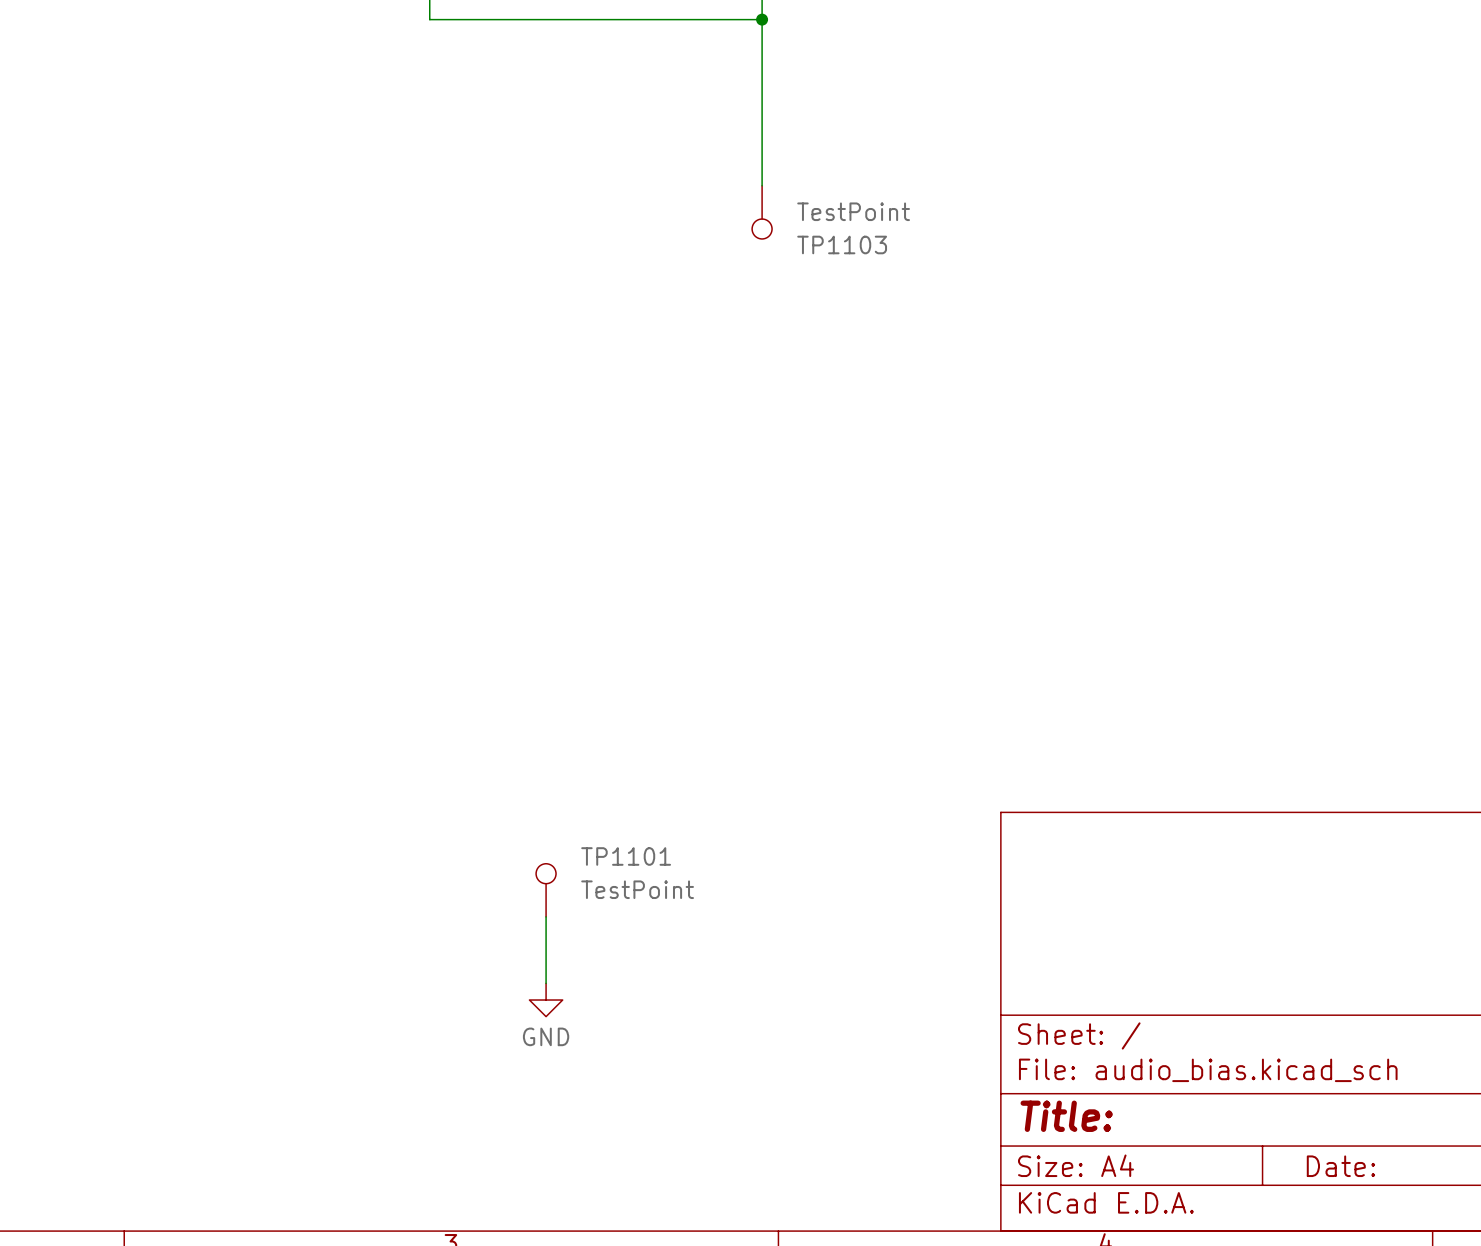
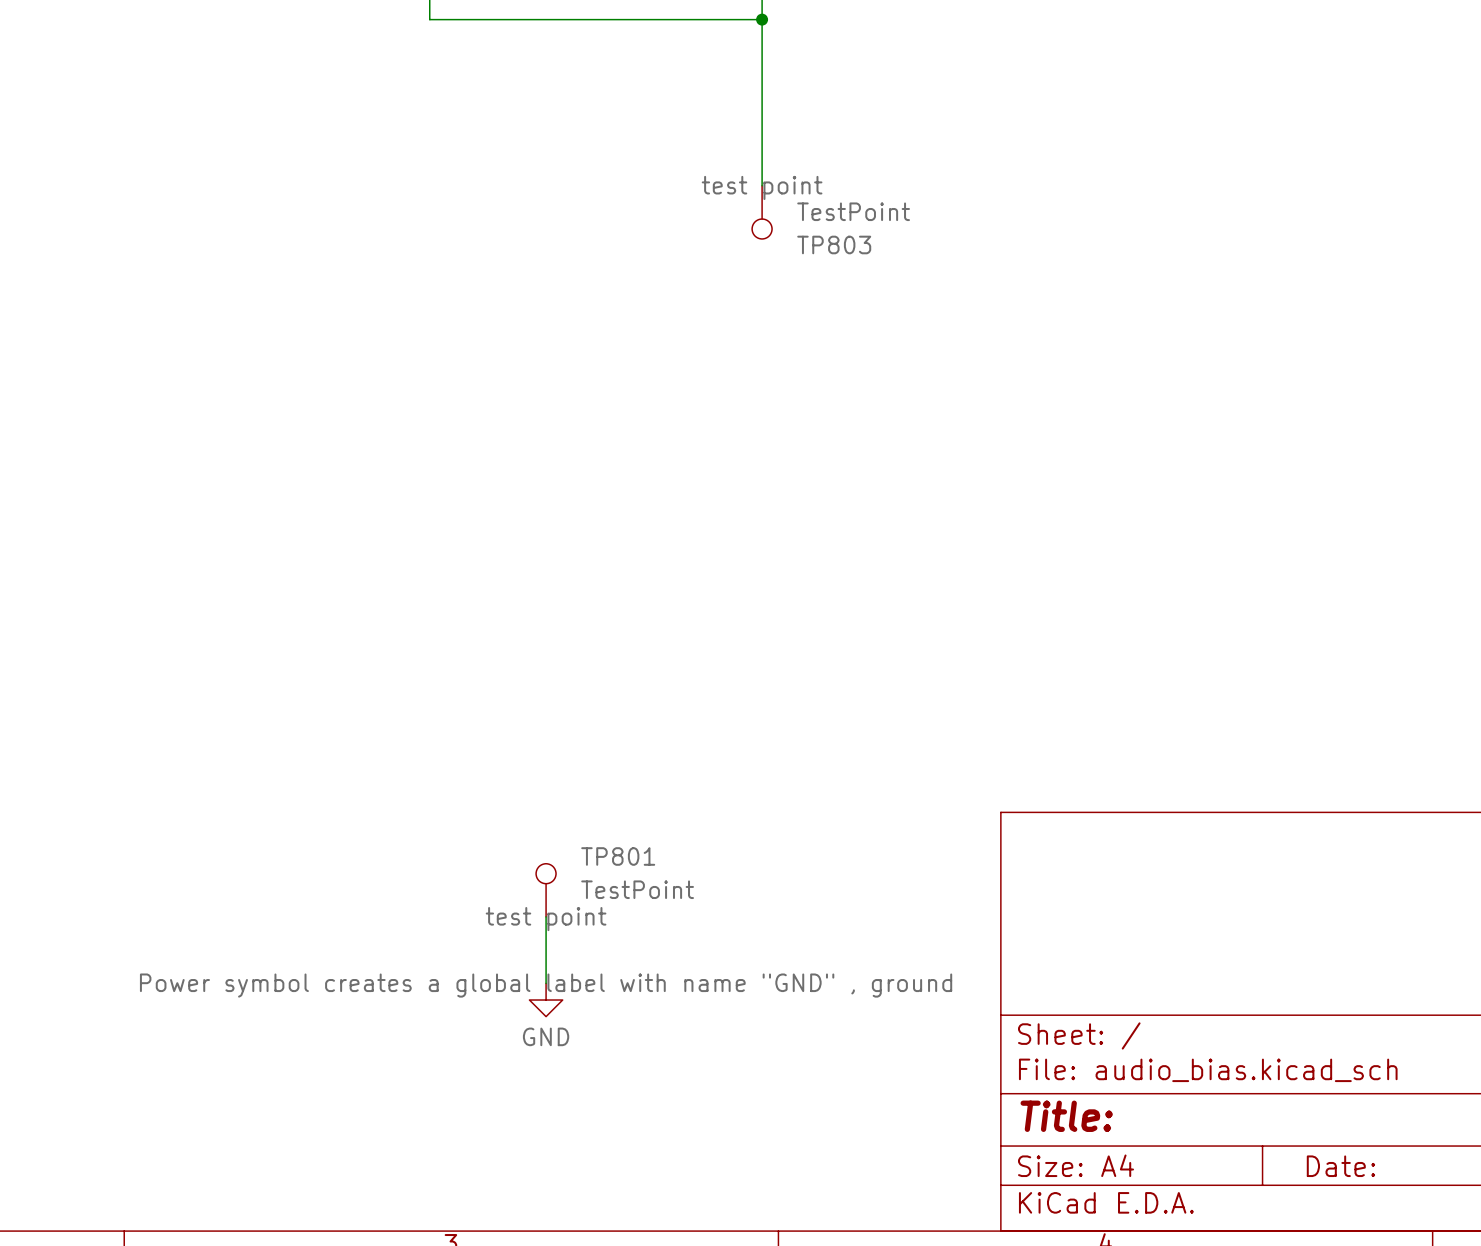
TP1103 text: none -> test point (762, 187)
TP1103 name: TP1103 (842, 244) -> TP803 (834, 244)
TP1101 name: TP1101 (626, 856) -> TP801 (618, 856)
TP1101 text: none -> test point (546, 919)
power symbol text: none -> Power symbol creates a global label with name "GND" , ground (546, 985)

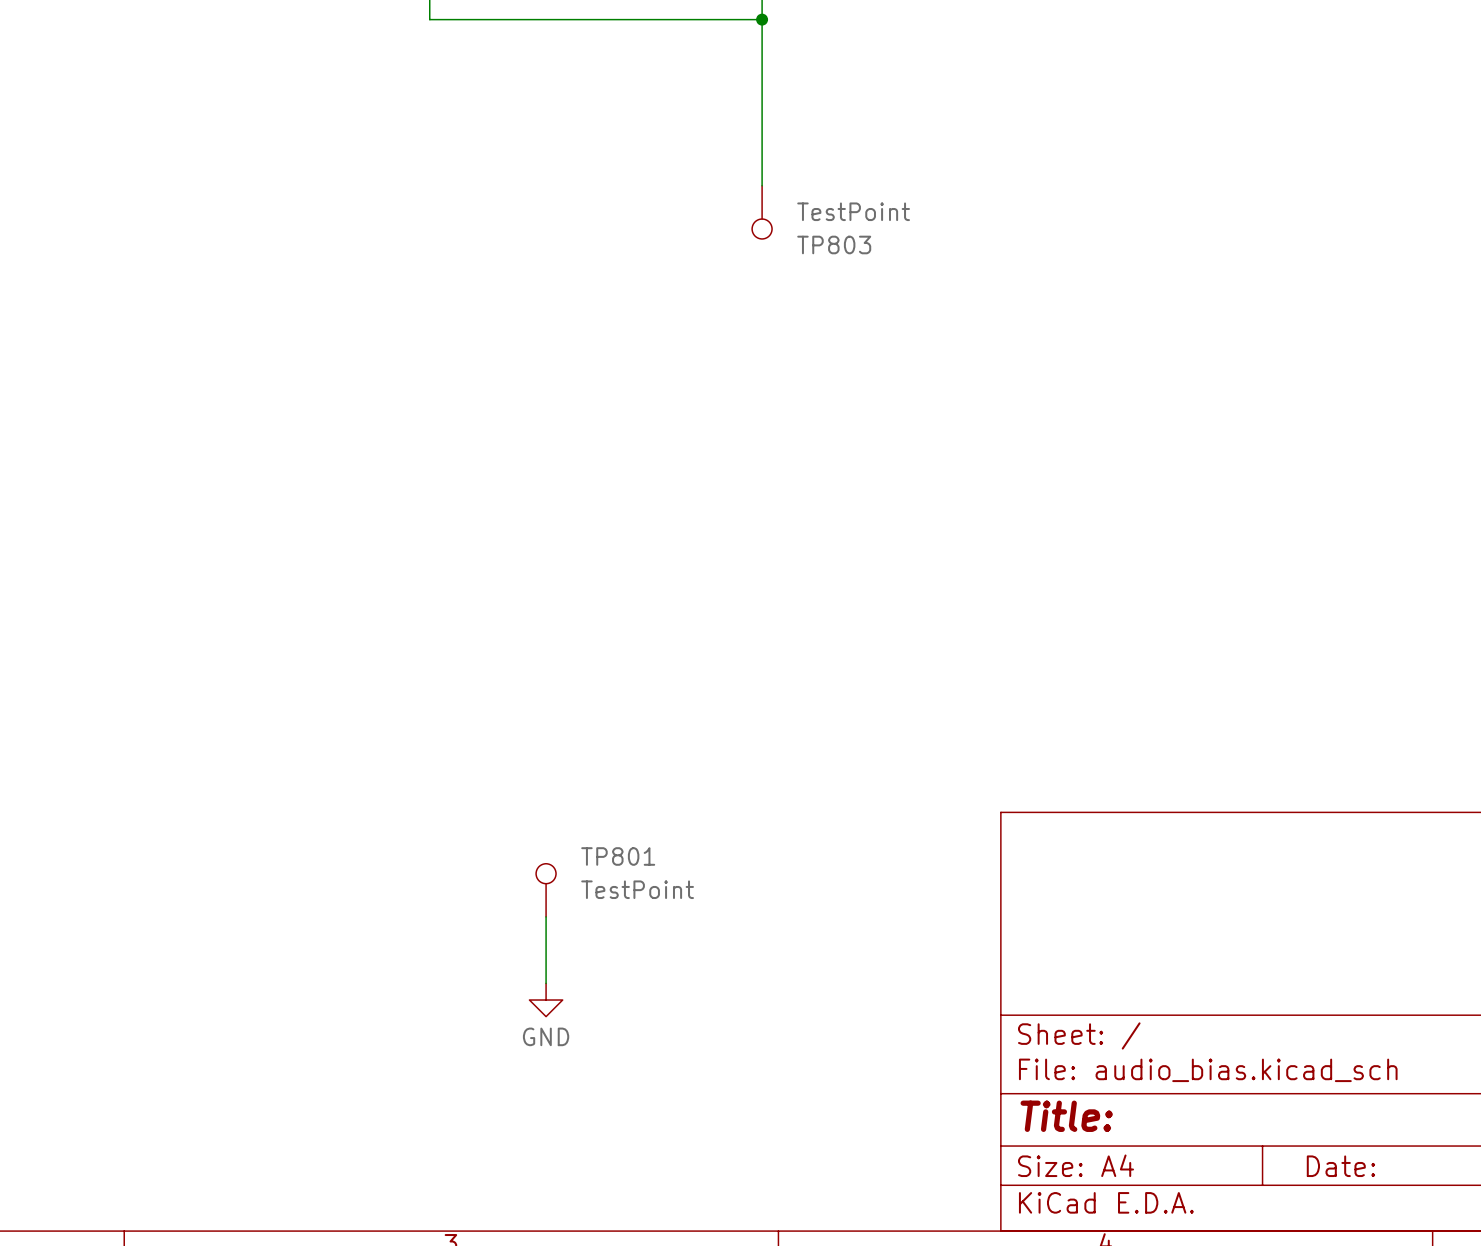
TP803 text: test point (762, 187) -> none
TP801 text: test point (546, 919) -> none
power symbol text: Power symbol creates a global label with name "GND" , ground (546, 985) -> none

